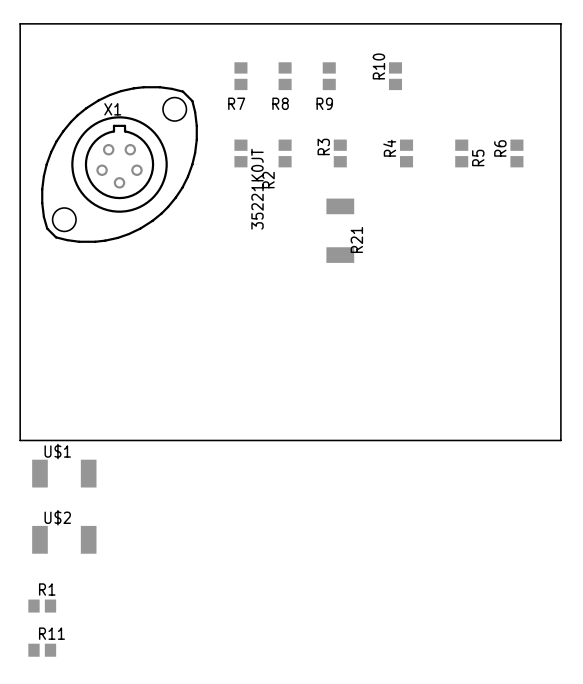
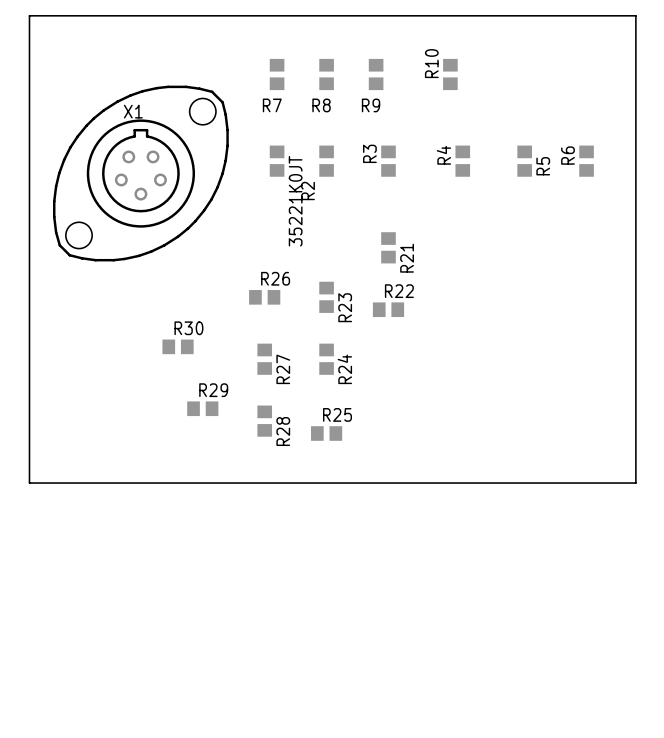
R21 footprint: [326, 198, 355, 263] -> [381, 232, 396, 264]
R26: none -> (264, 297)
R23: none -> (326, 297)
R22: none -> (388, 309)
R30: none -> (178, 346)
R27: none -> (264, 359)
R24: none -> (326, 359)
R29: none -> (202, 408)
R28: none -> (264, 421)
R25: none -> (326, 433)
U$1: (64, 473) -> none
U$2: (64, 539) -> none
R1: (42, 606) -> none
R11: (42, 650) -> none

